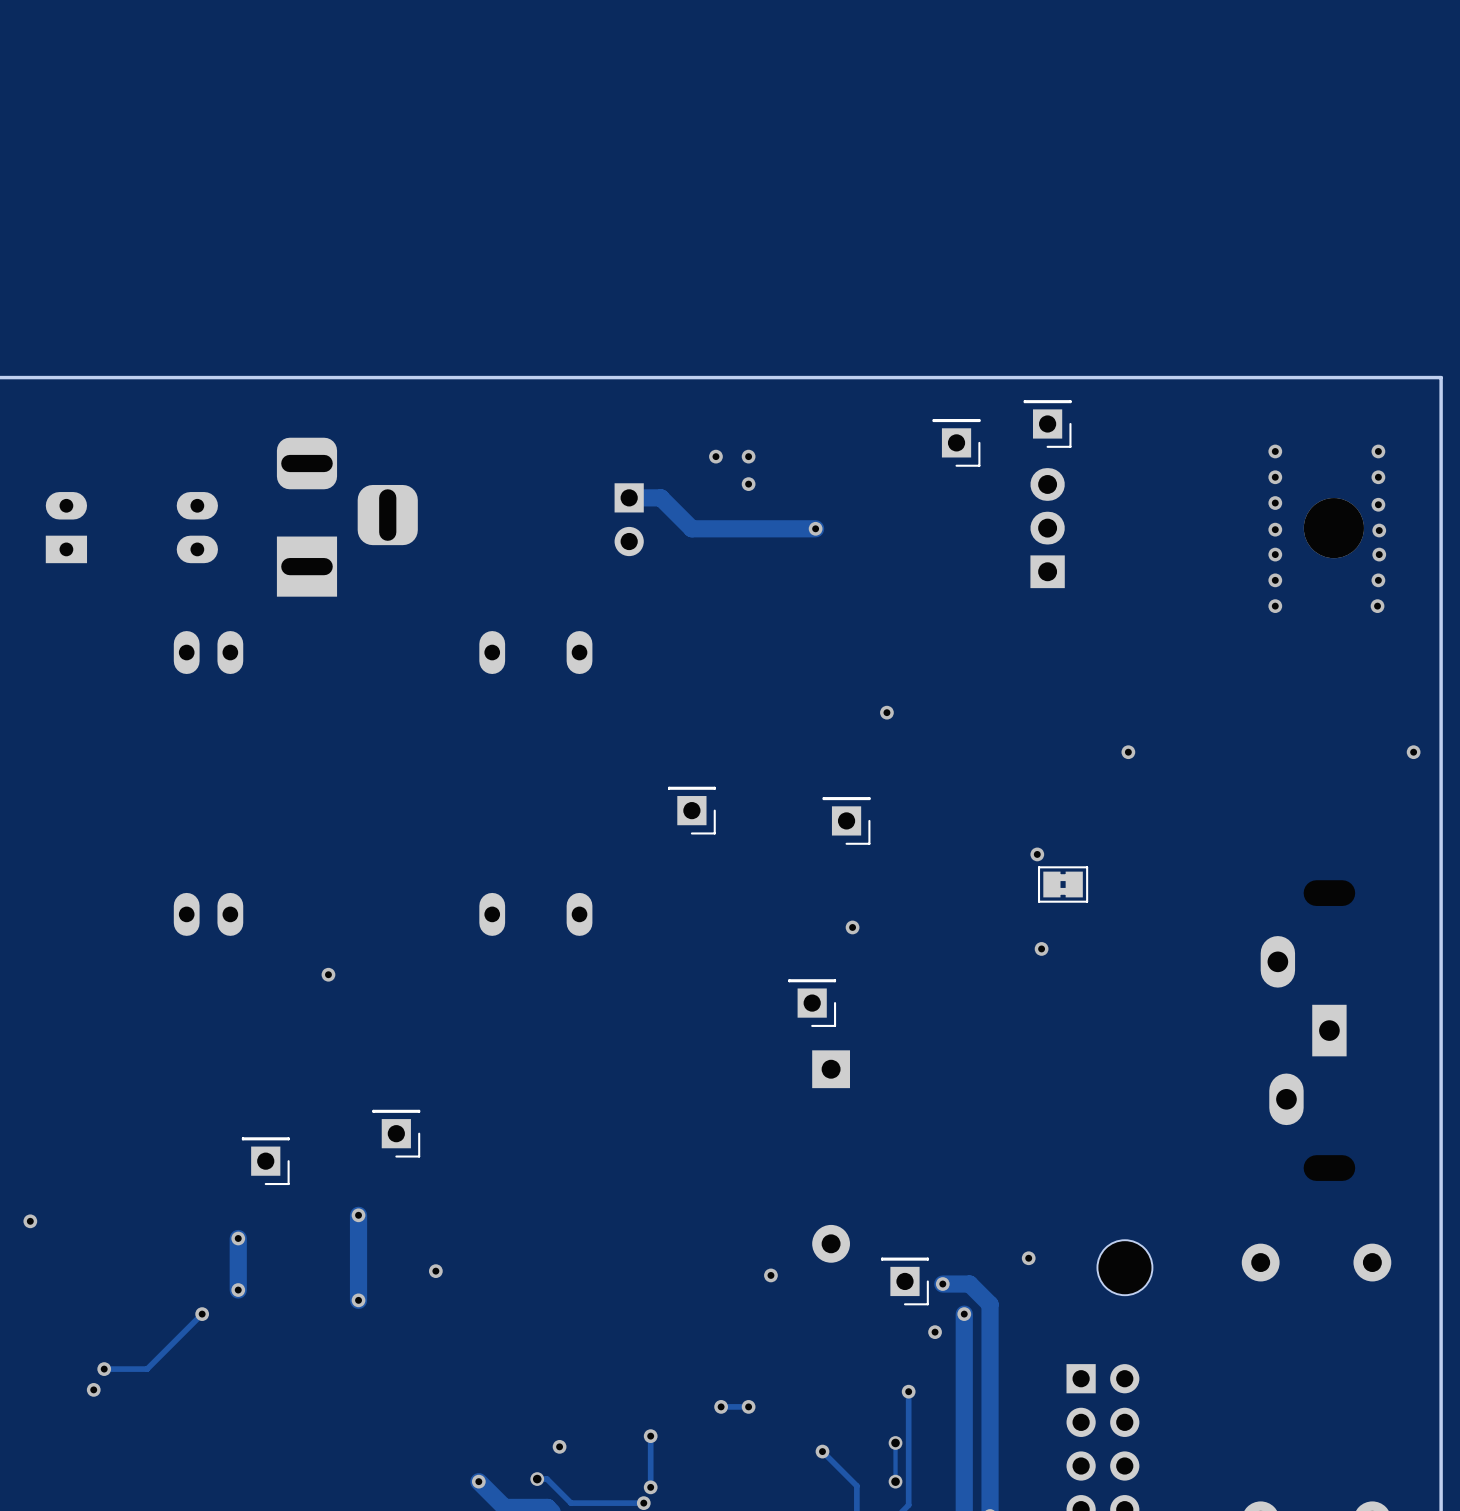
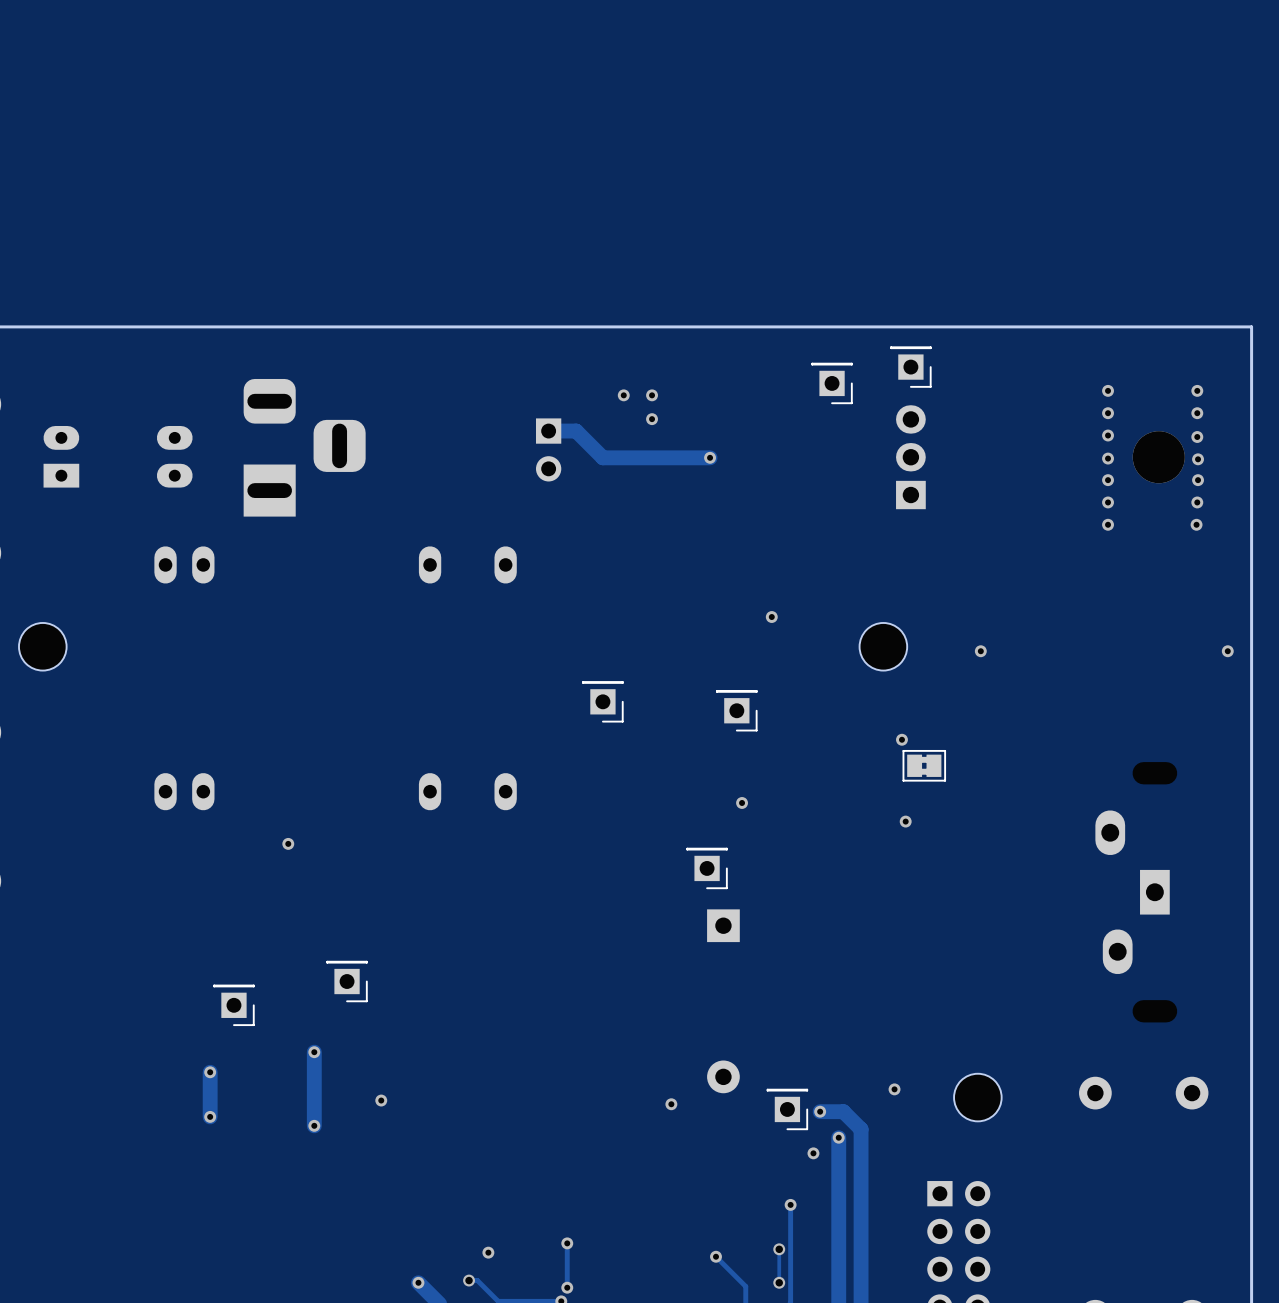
part: none -> (42, 646)
part: none -> (883, 646)
via: (30, 1221) -> none
track: (202, 1314) (147, 1369) (104, 1369) -> none
via: (202, 1314) -> none
via: (104, 1369) -> none
via: (93, 1389) -> none
via: (721, 1406) -> none
track: (748, 1406) (721, 1406) -> none
via: (748, 1406) -> none

